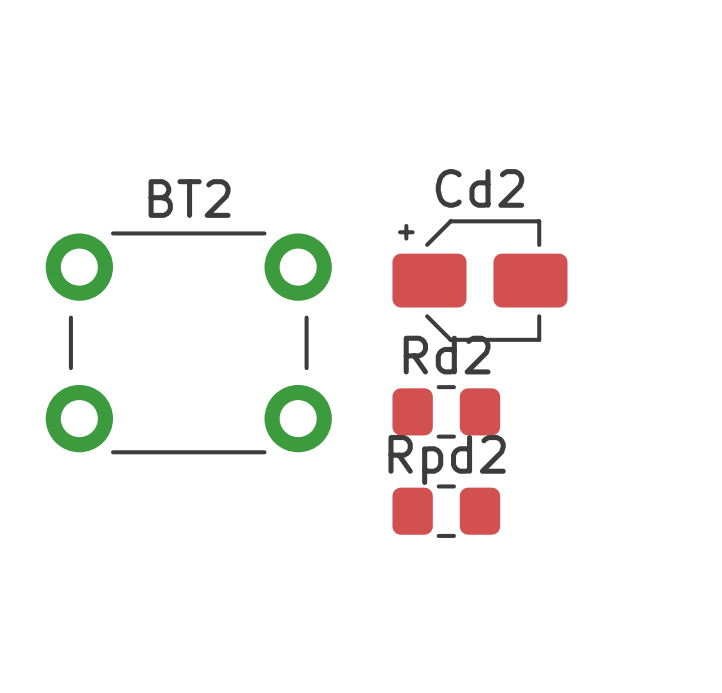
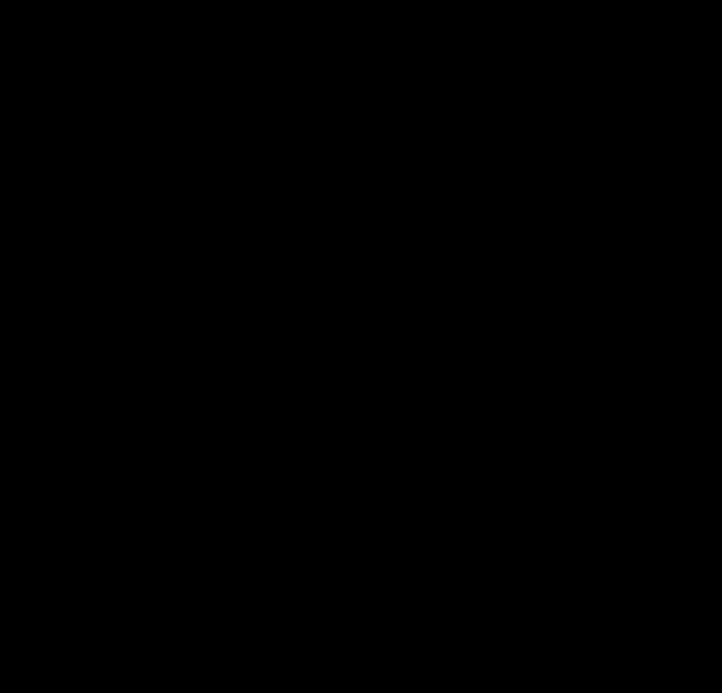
Cd2: (479, 280) -> none
BT2: (188, 342) -> none
Rd2: (446, 411) -> none
Rpd2: (446, 511) -> none

